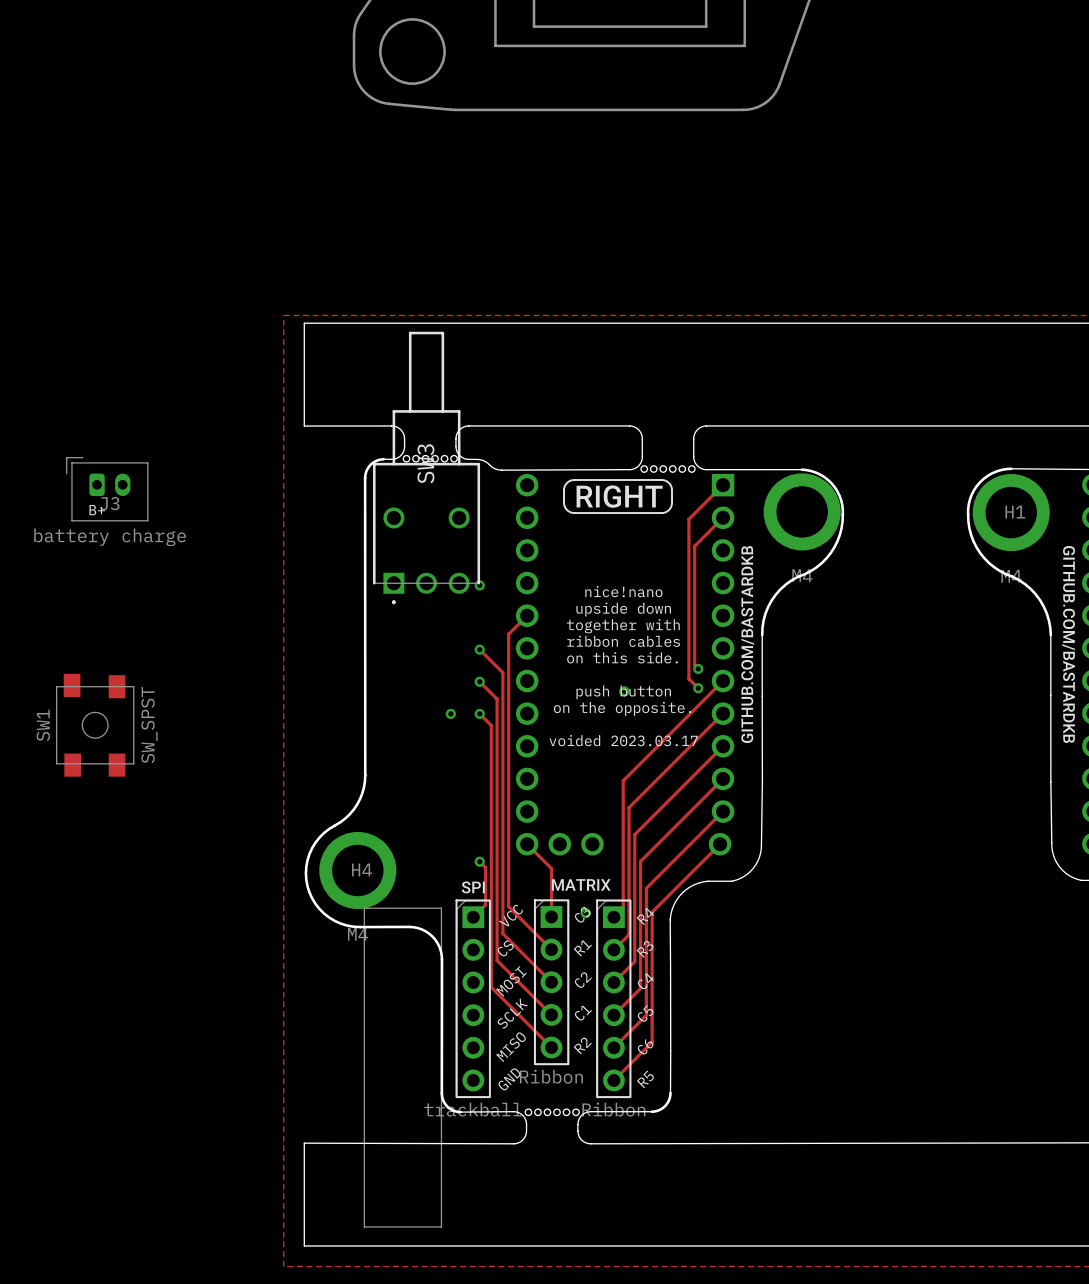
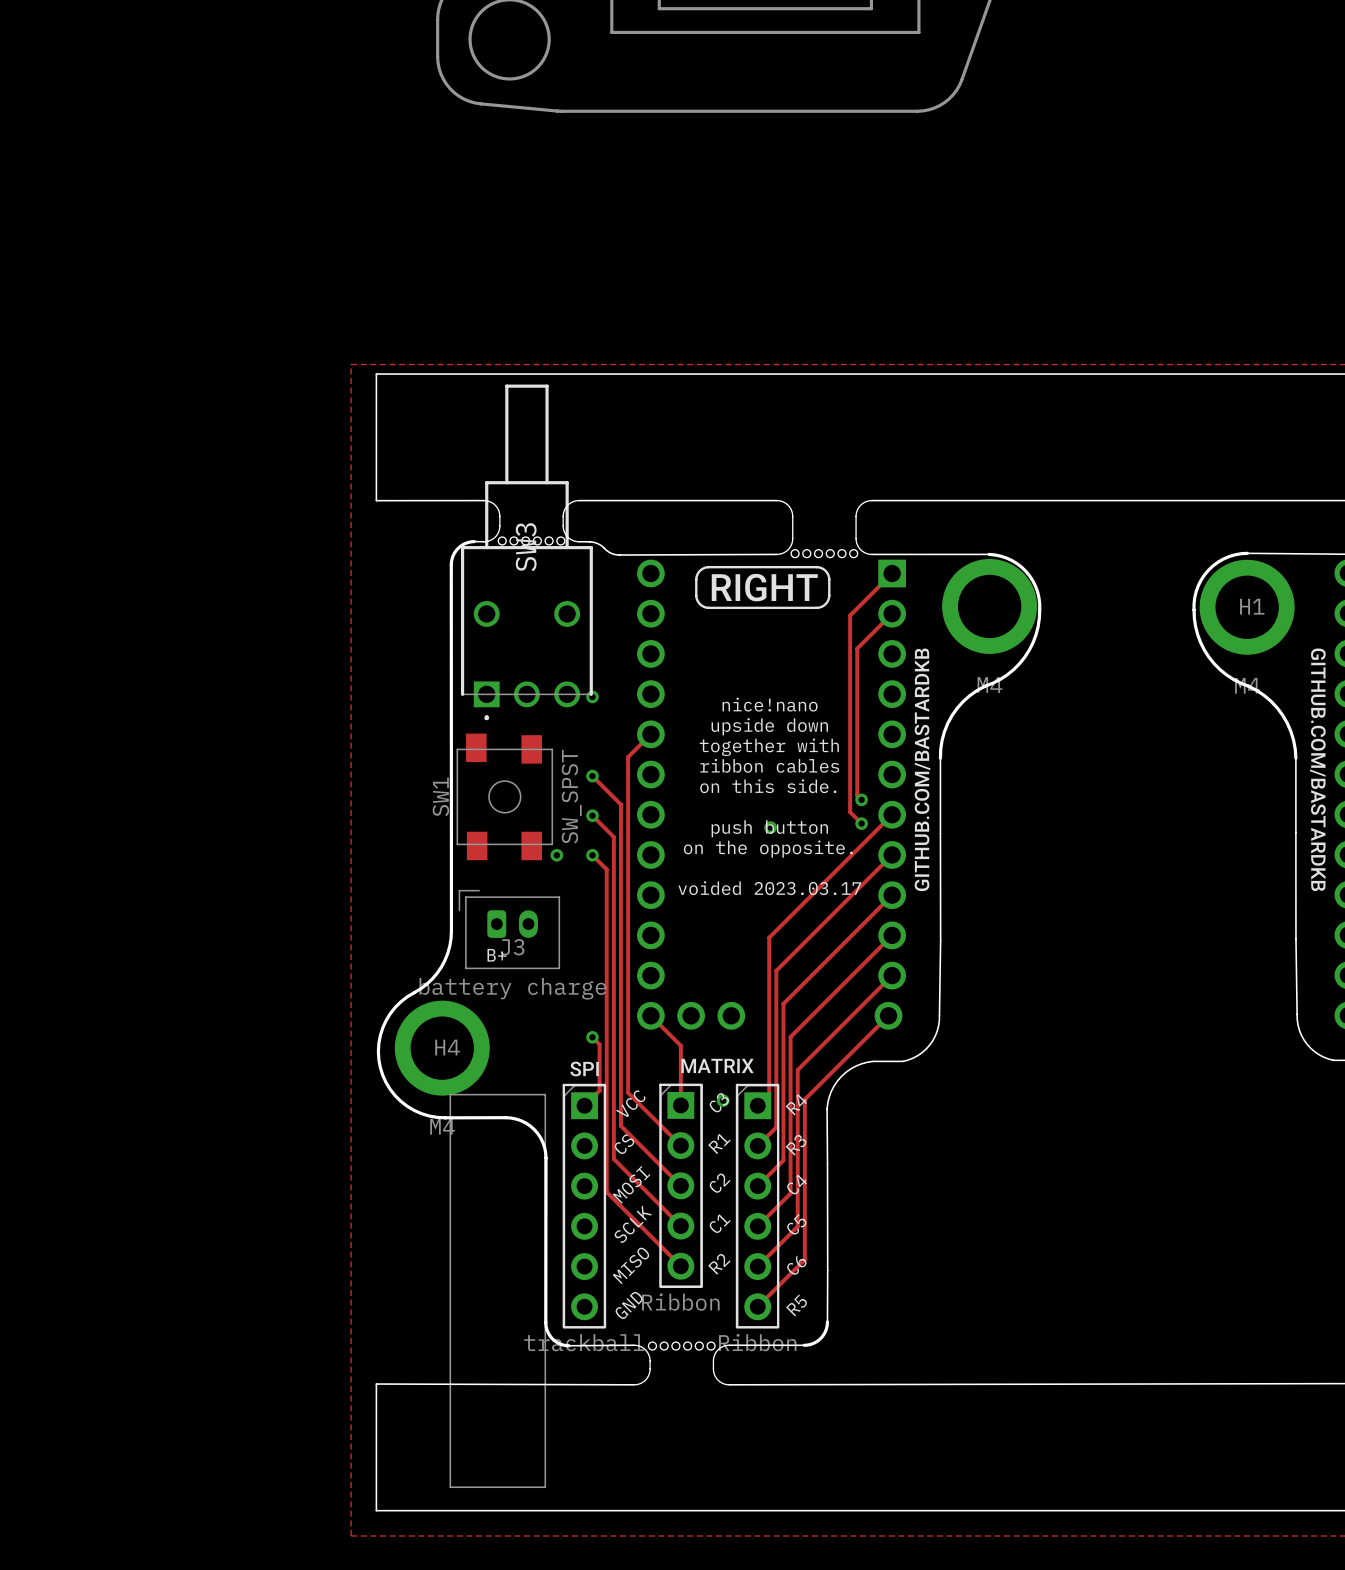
J3 position: (107, 489) -> (509, 929)
text: B+ (97, 510) -> none
SW1 position: (95, 725) -> (504, 796)
text: none -> B+ (497, 955)

